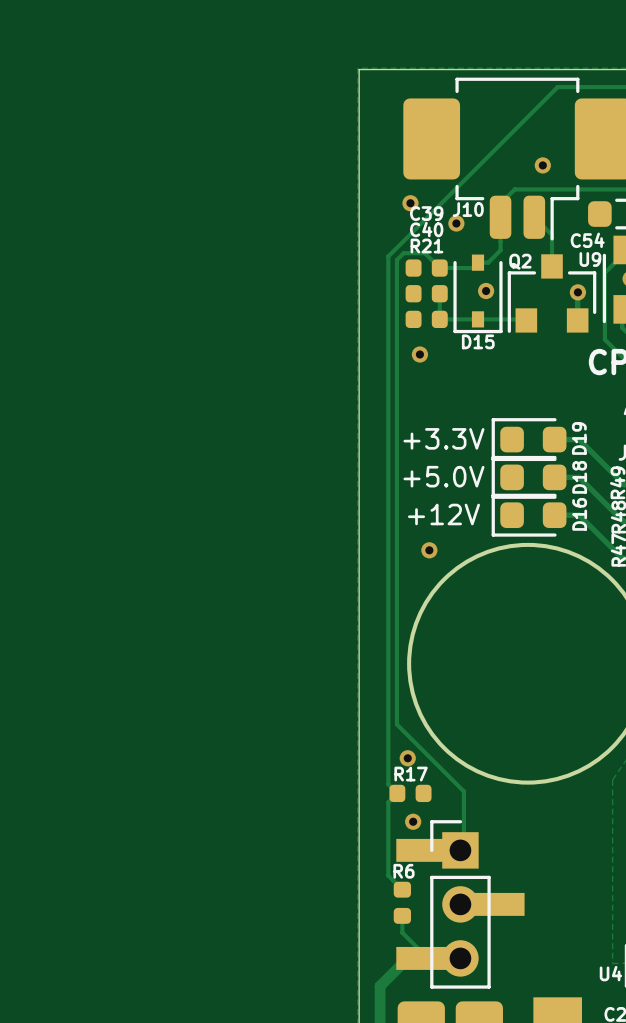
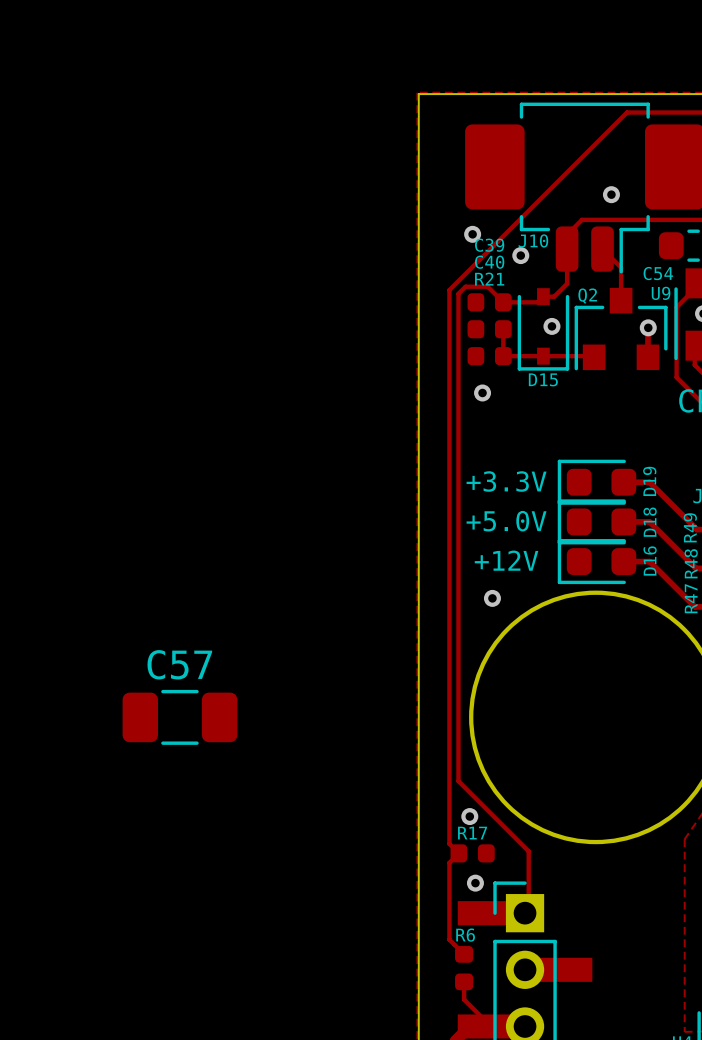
C57: none -> (179, 717)

